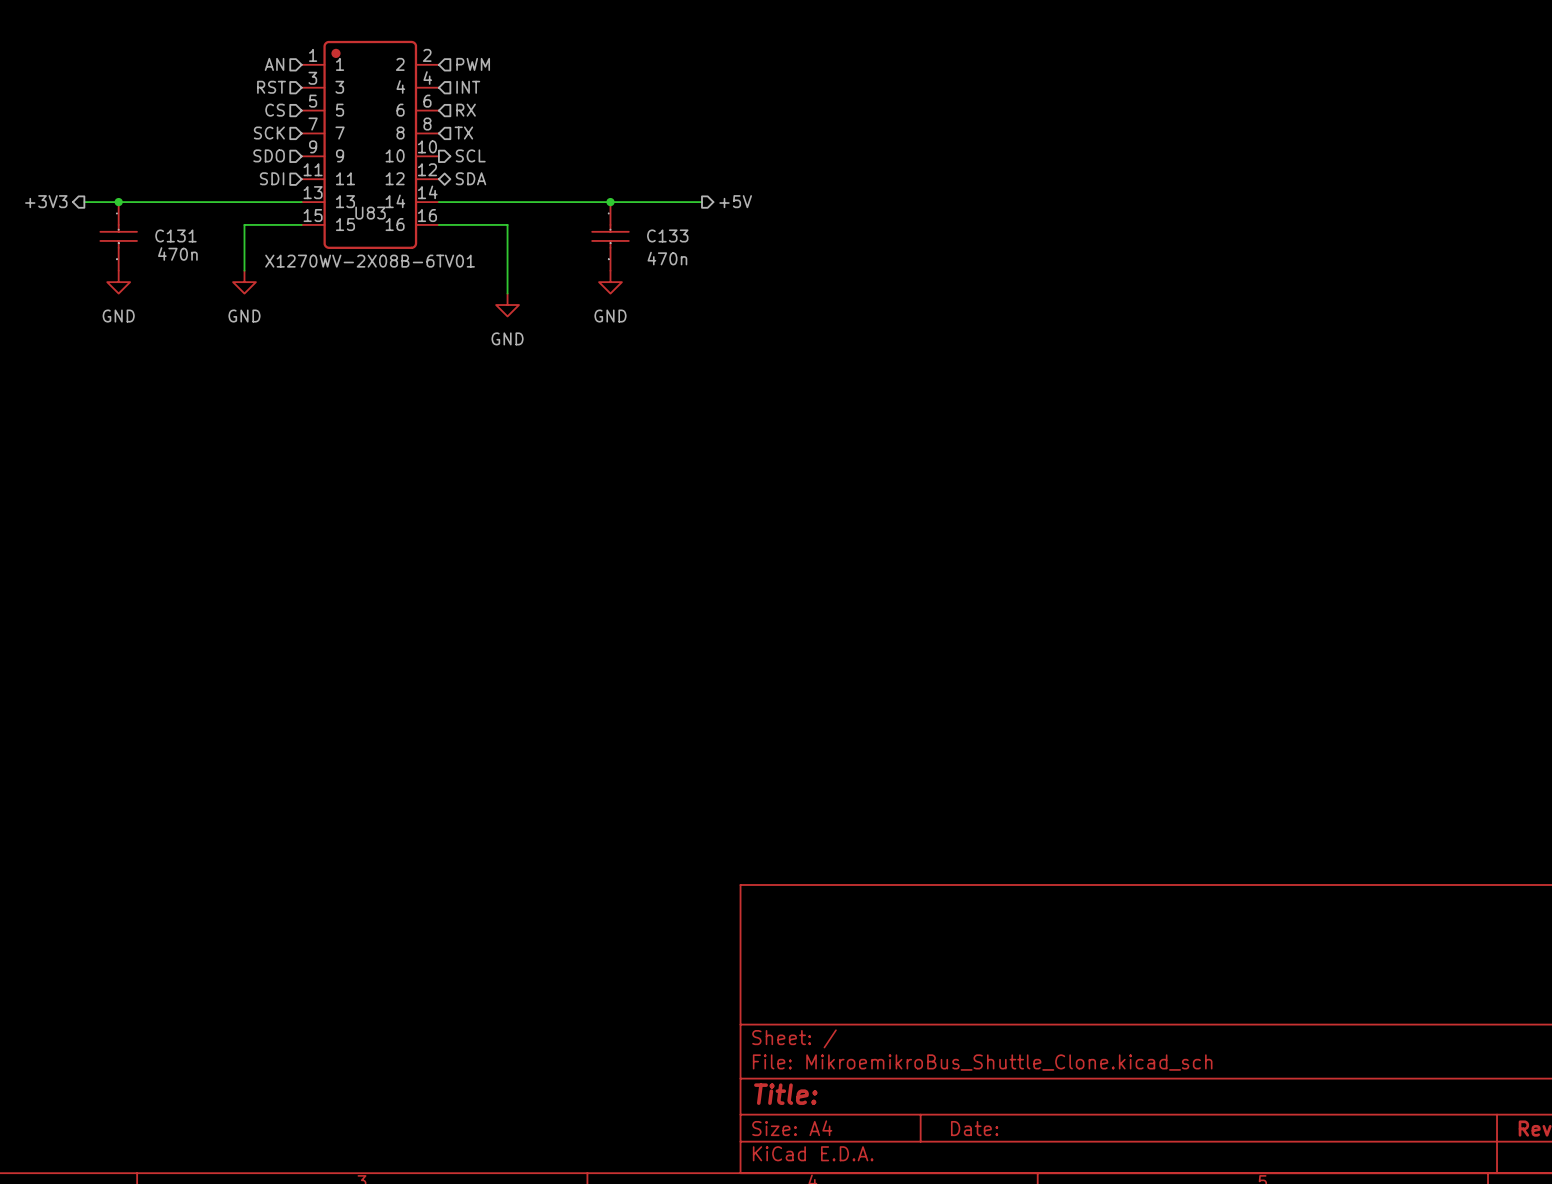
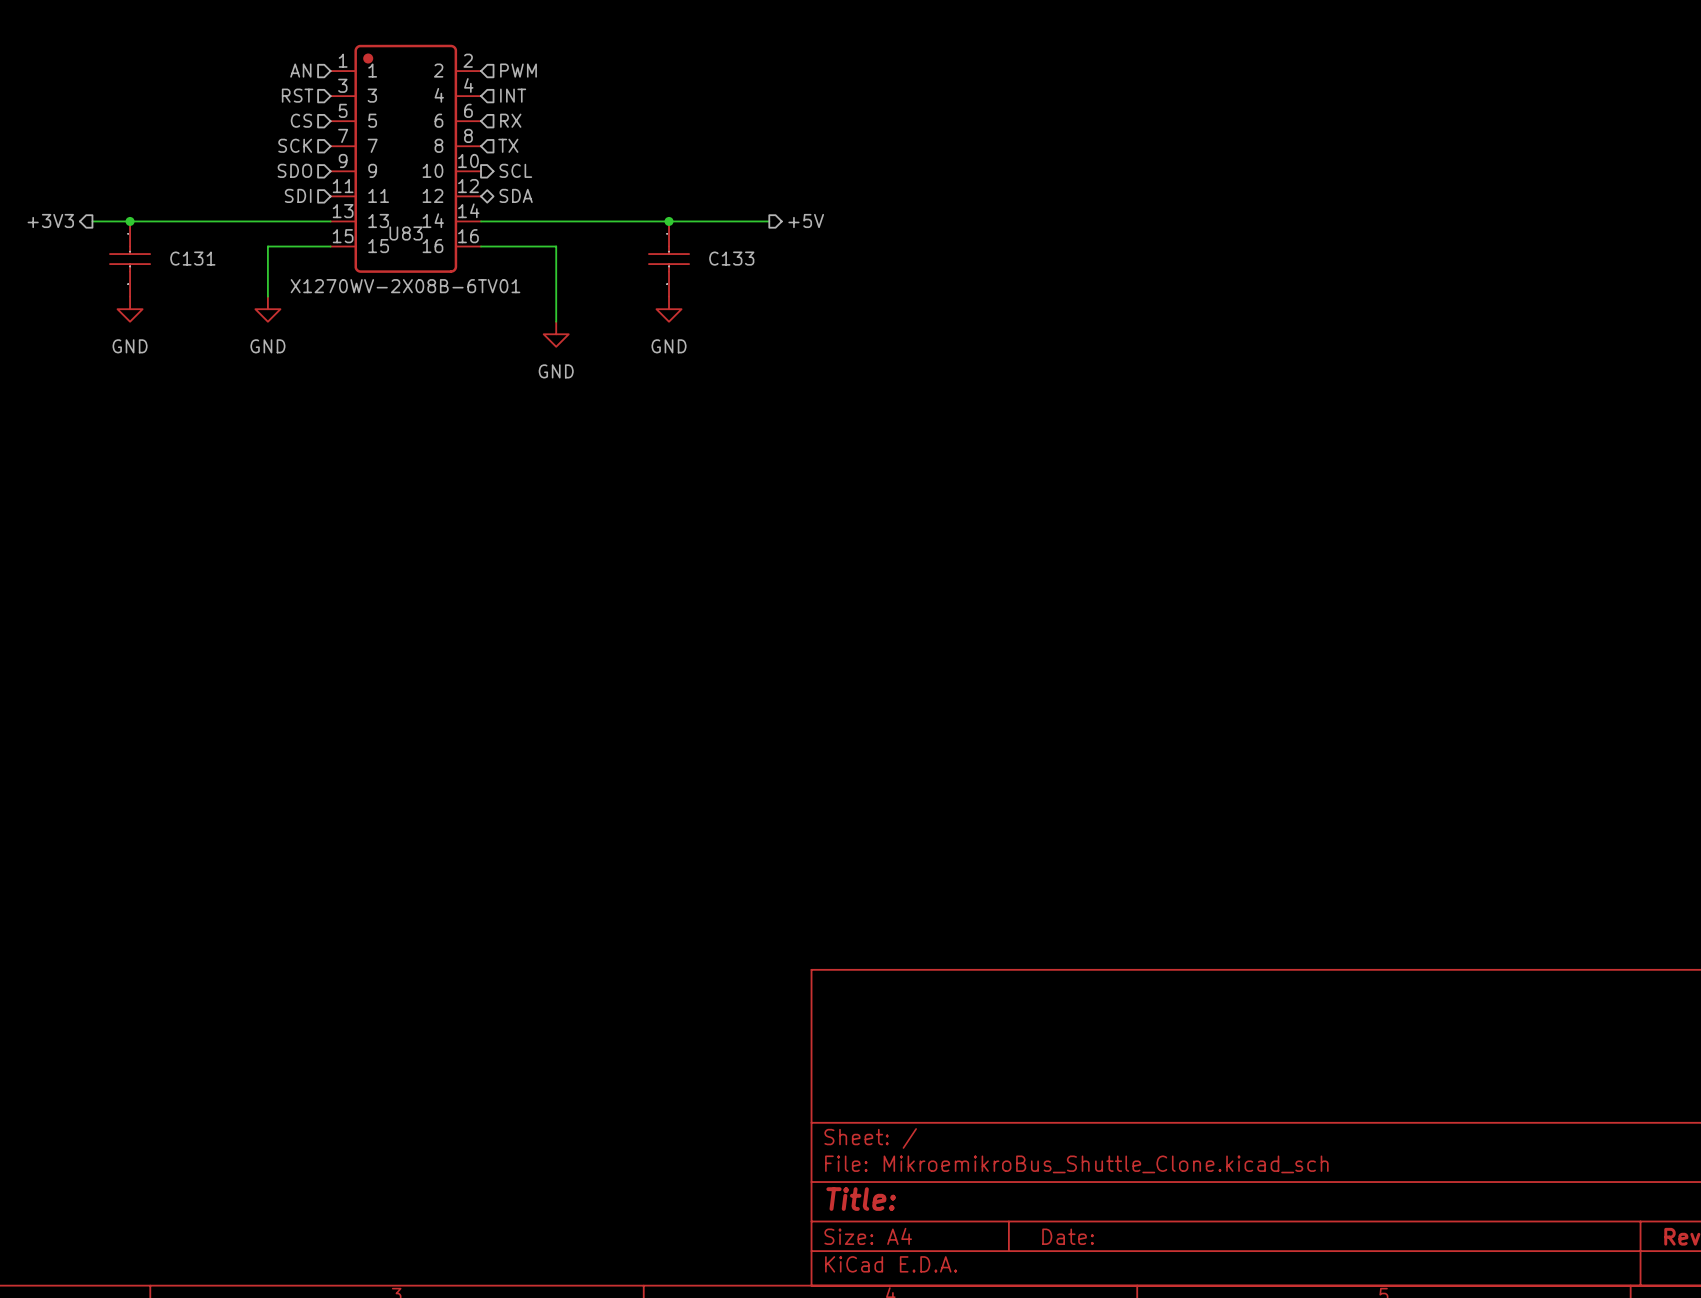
C131 value: 470n (177, 253) -> none
C133 value: 470n (667, 258) -> none

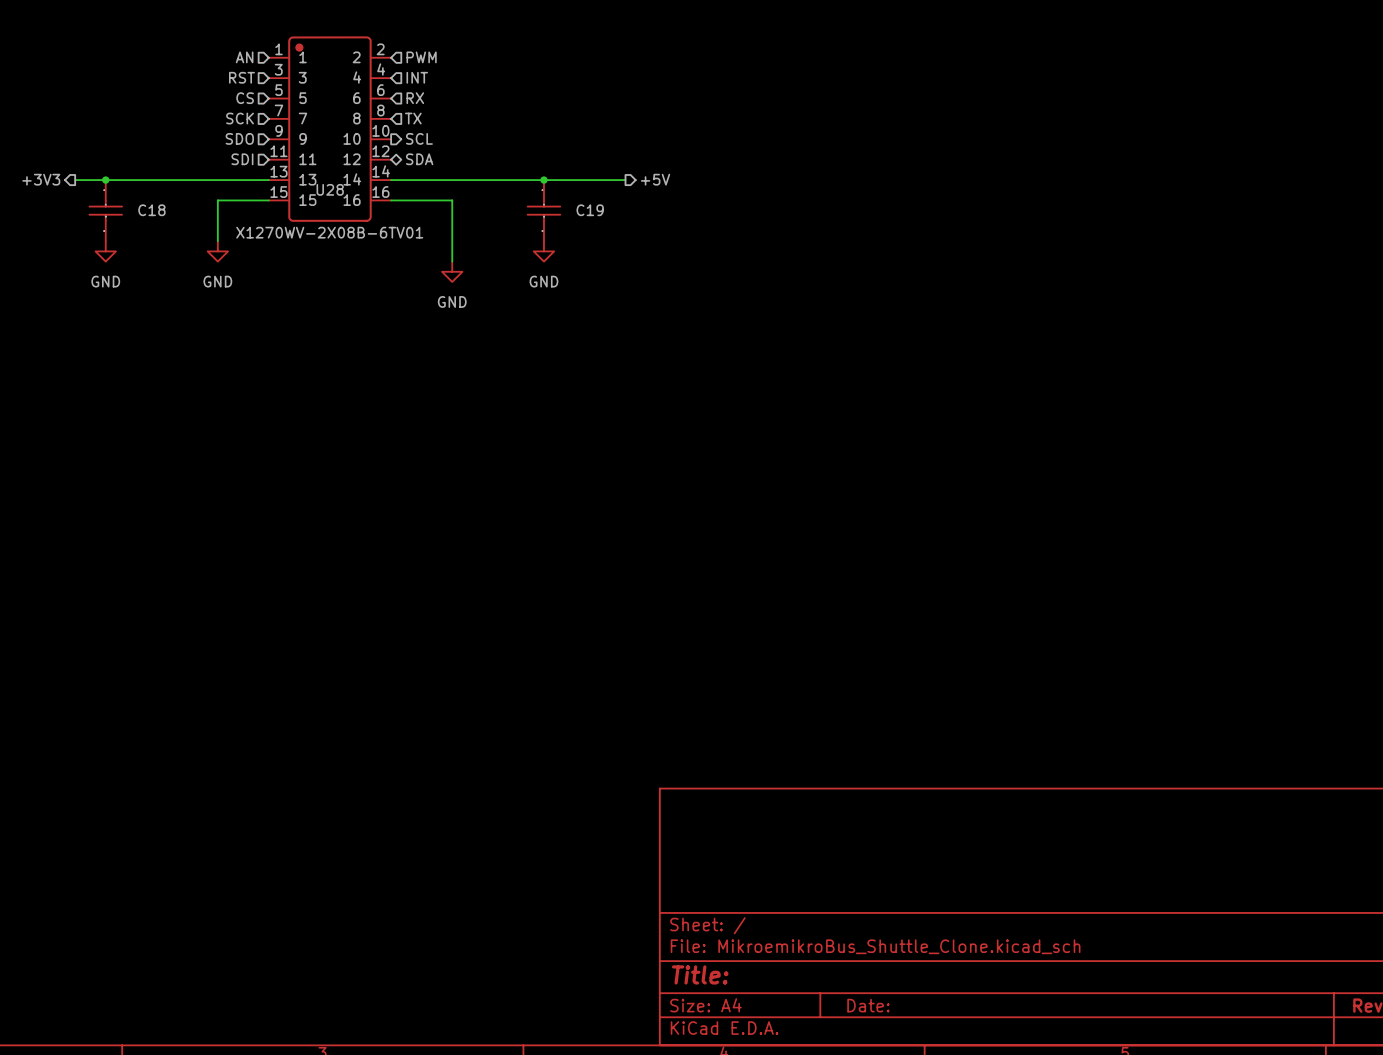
U83 name: U83 (406, 233) -> U28 (330, 189)
C131 name: C131 (192, 258) -> C18 (151, 210)
C133 name: C133 (731, 258) -> C19 (590, 210)

